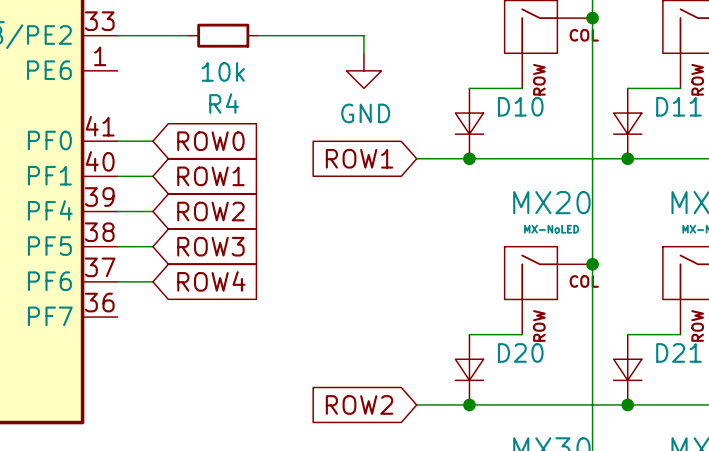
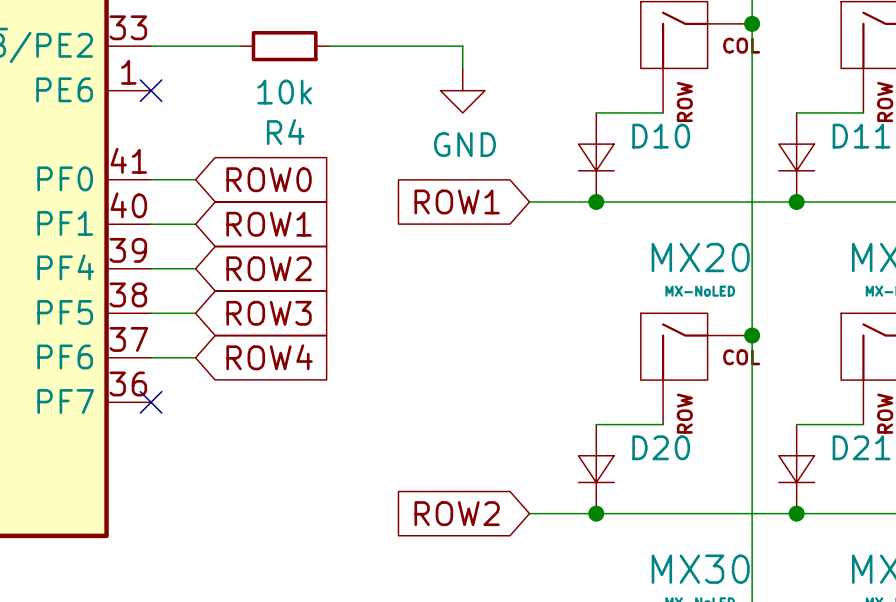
no-connect mark: none -> (151, 90)
no-connect mark: none -> (151, 402)

